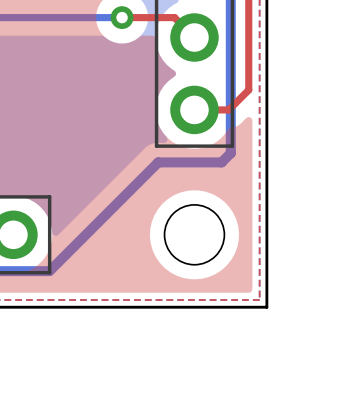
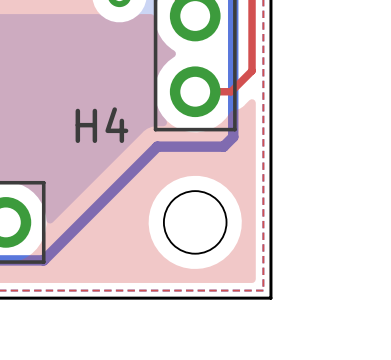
H4 name: none -> H4 (101, 125)

